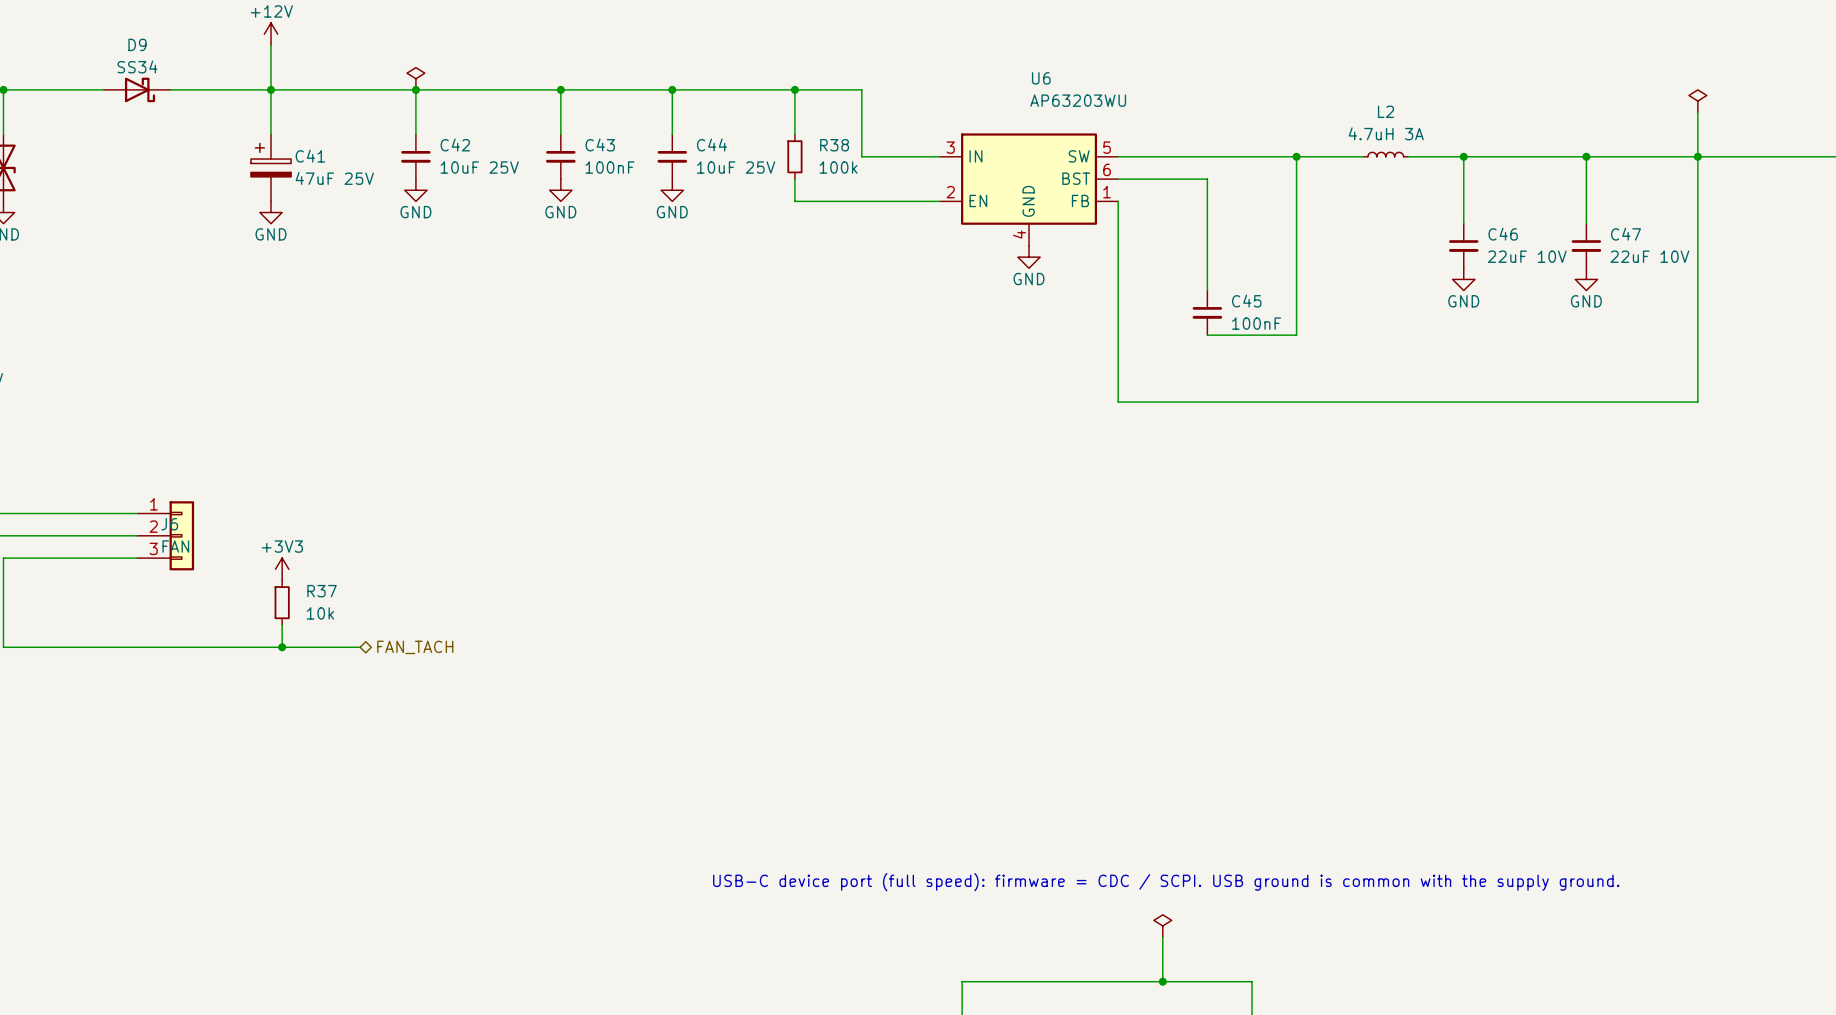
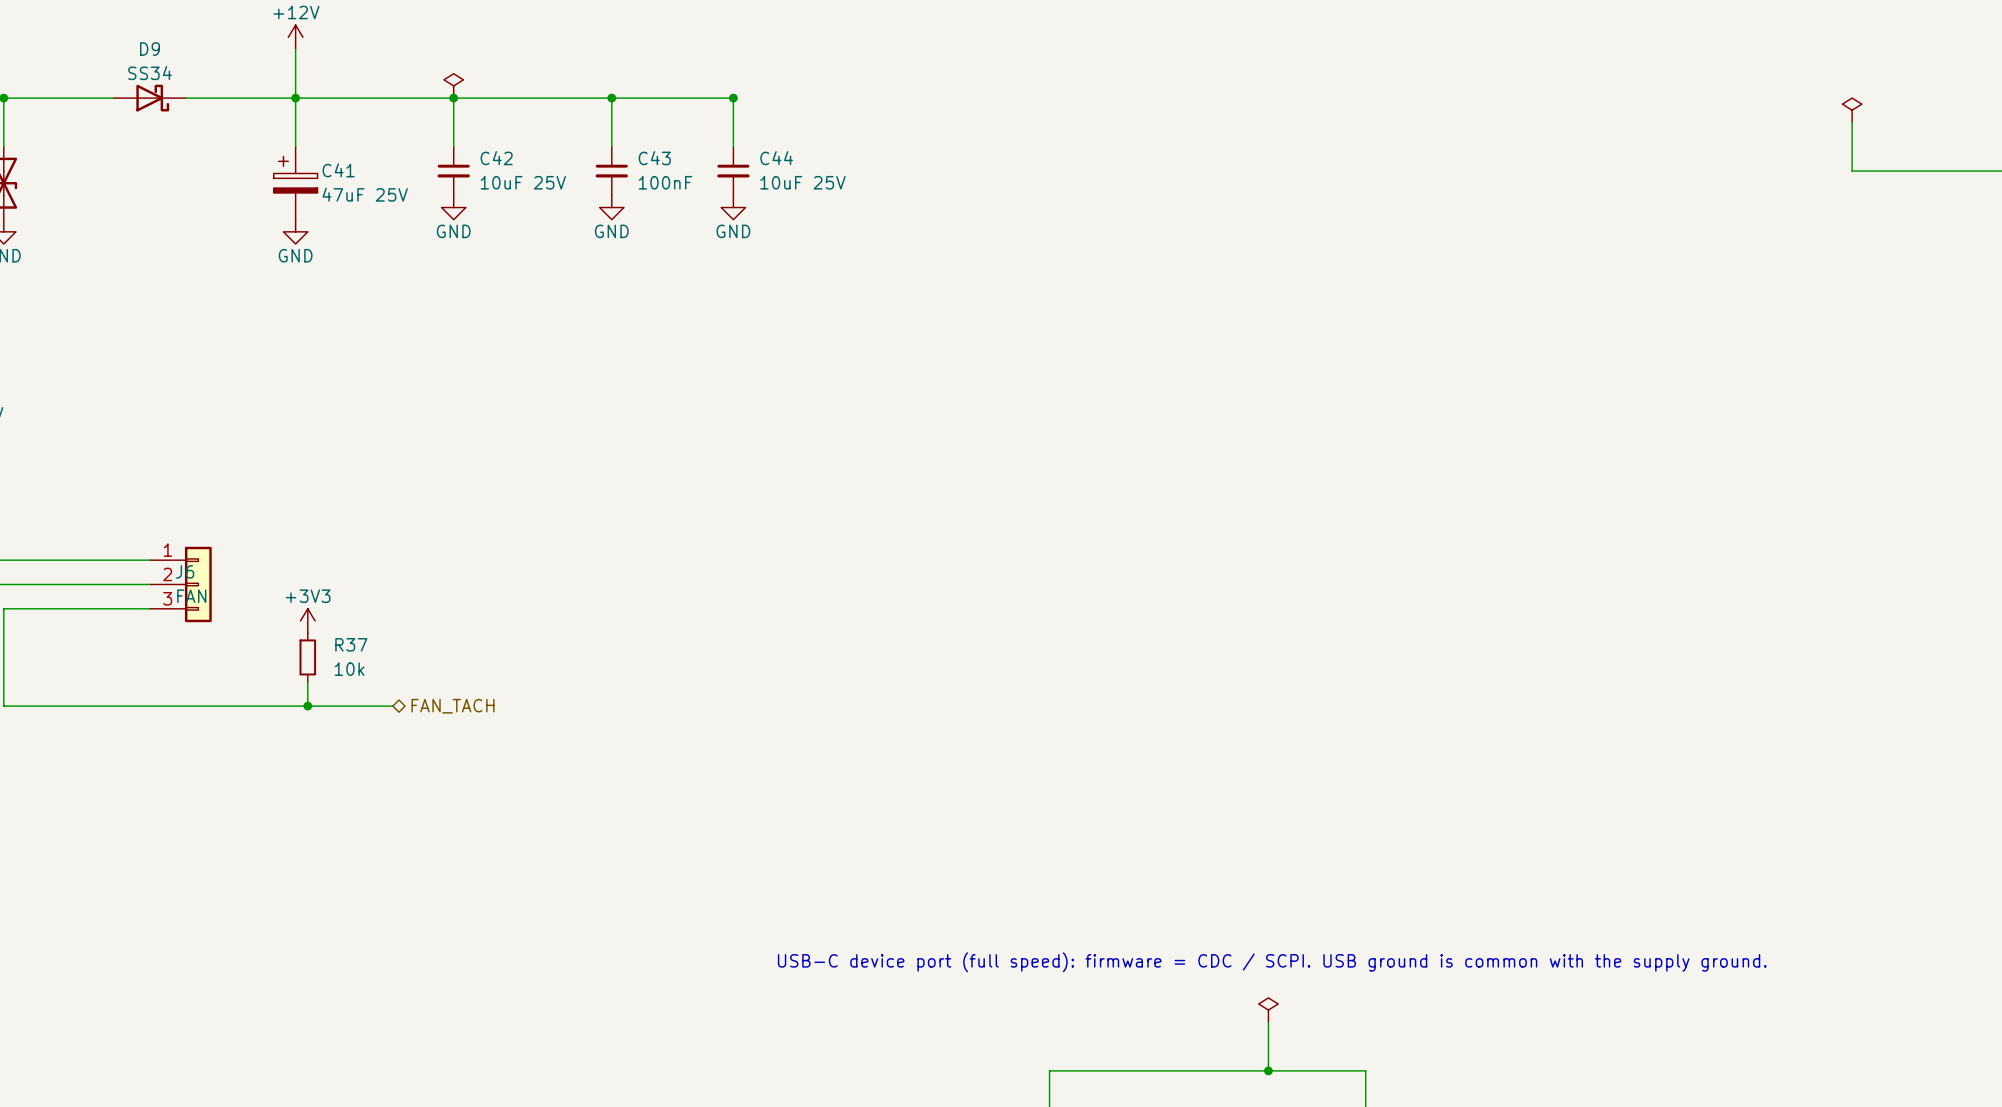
wire: (672, 89) (861, 89) (861, 156) (939, 156) -> none
wire: (794, 89) (794, 134) -> none
junction: (794, 89) -> none
L2: 4.7uH 3A (1385, 154) -> none
R38: 100k (794, 156) -> none
wire: (1118, 156) (1363, 156) -> none
wire: (1296, 156) (1296, 335) (1207, 335) -> none
junction: (1296, 156) -> none
wire: (1408, 156) (1697, 156) (1697, 402) (1118, 402) (1118, 201) -> none
wire: (1463, 156) (1463, 223) -> none
junction: (1463, 156) -> none
wire: (1586, 156) (1586, 223) -> none
junction: (1586, 156) -> none
junction: (1697, 156) -> none
wire: (794, 179) (794, 201) (939, 201) -> none
wire: (1118, 179) (1207, 179) (1207, 290) -> none
U6: AP63203WU (1029, 189) -> none
C46: 22uF 10V (1463, 245) -> none
C47: 22uF 10V (1586, 245) -> none
power symbol: GND (1029, 257) -> none
power symbol: GND (1463, 279) -> none
power symbol: GND (1586, 279) -> none
C45: 100nF (1207, 312) -> none

